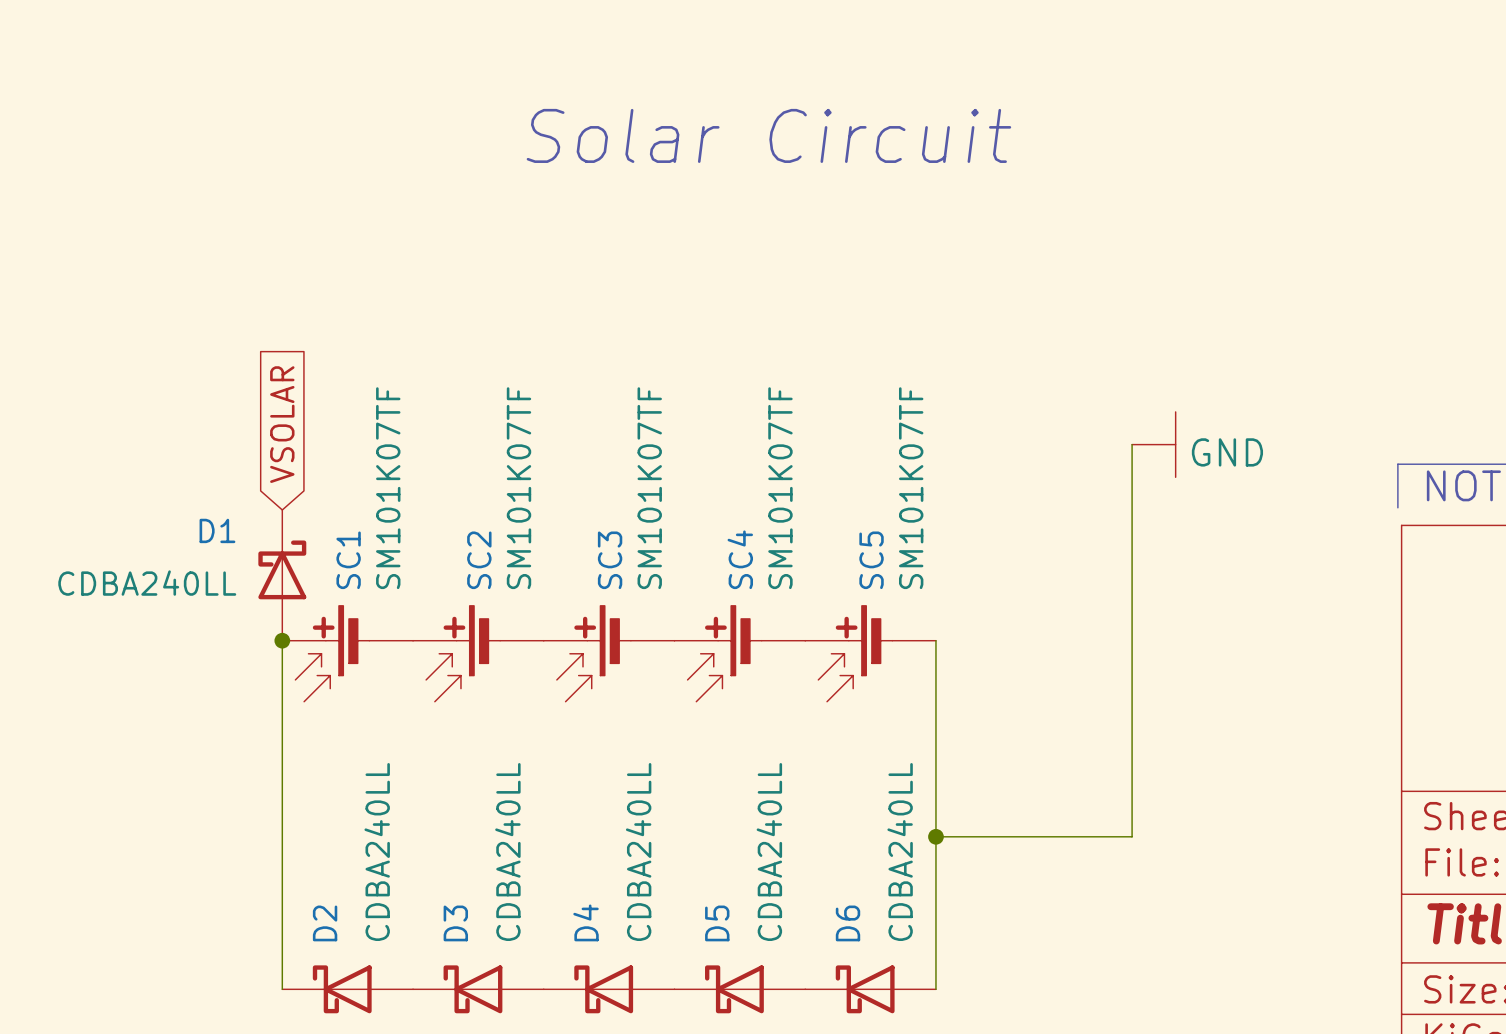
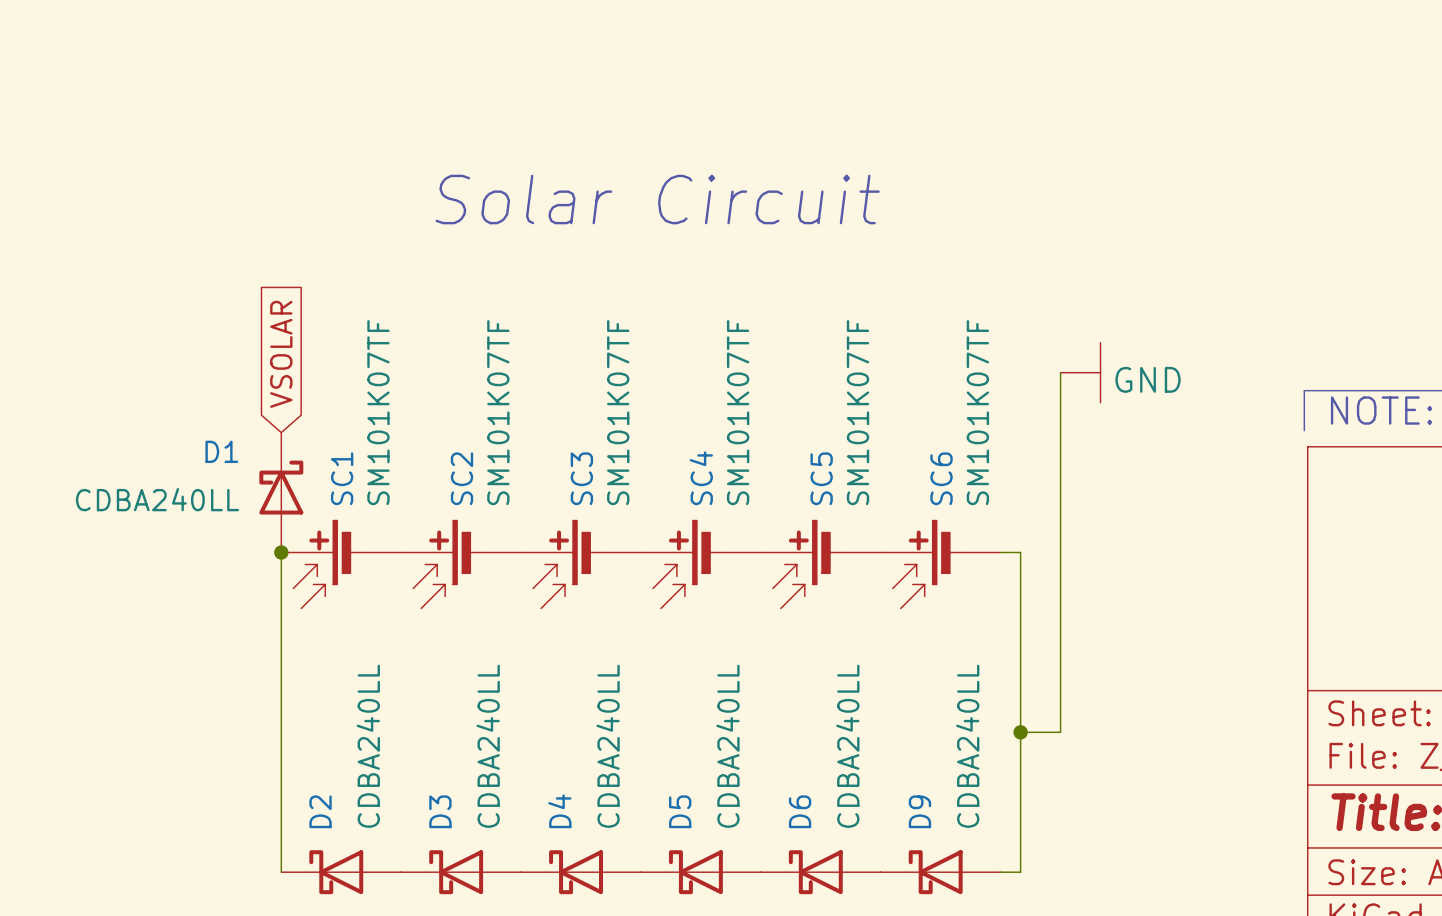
text position: Solar Circuit (768, 135) -> Solar Circuit (657, 199)
wire: (935, 640) (935, 989) -> none
wire: none -> (1000, 552) (1020, 552) (1020, 872) (1000, 872)
SC6: none -> SM101K07TF (940, 564)
wire: (935, 836) (1088, 836) -> none
junction: (935, 836) -> none
junction: none -> (1020, 732)
D9: none -> CDBA240LL (940, 872)

